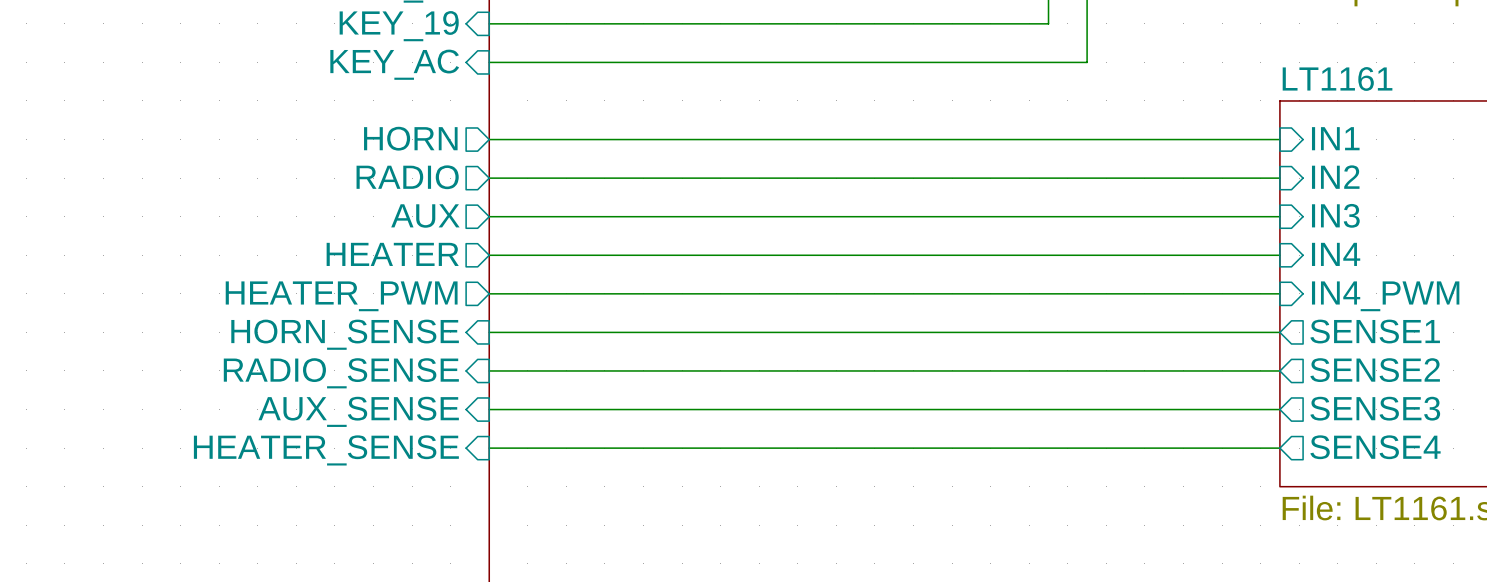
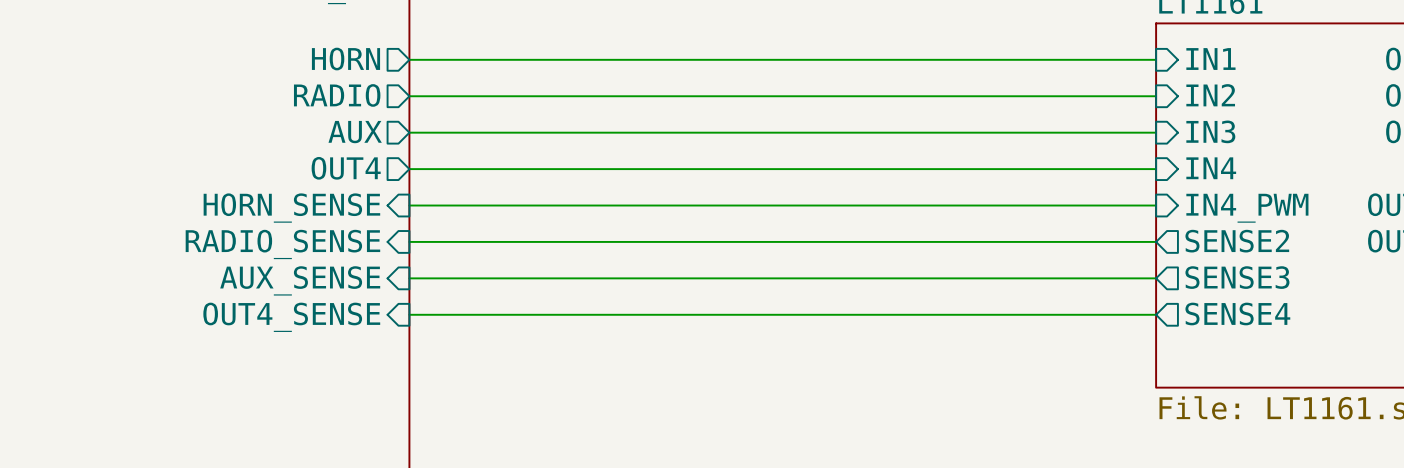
sheet pin: HEATER (392, 254) -> OUT4 (346, 168)
sheet pin shape: output (341, 296) -> input (291, 208)
sheet pin: HEATER_PWM (341, 296) -> HORN_SENSE (291, 208)
sheet pin: SENSE1 (1375, 331) -> SENSE2 (1237, 241)
sheet pin: HORN_SENSE (345, 334) -> RADIO_SENSE (282, 244)
sheet pin: SENSE2 (1375, 370) -> SENSE3 (1237, 277)
sheet pin: RADIO_SENSE (341, 373) -> AUX_SENSE (300, 280)
sheet pin: SENSE3 (1375, 408) -> SENSE4 (1237, 313)
sheet pin: AUX_SENSE (358, 411) -> OUT4_SENSE (291, 317)
sheet pin: SENSE4 (1375, 447) -> none
wire: (489, 448) (1279, 448) -> none
sheet pin: HEATER_SENSE (326, 450) -> none

